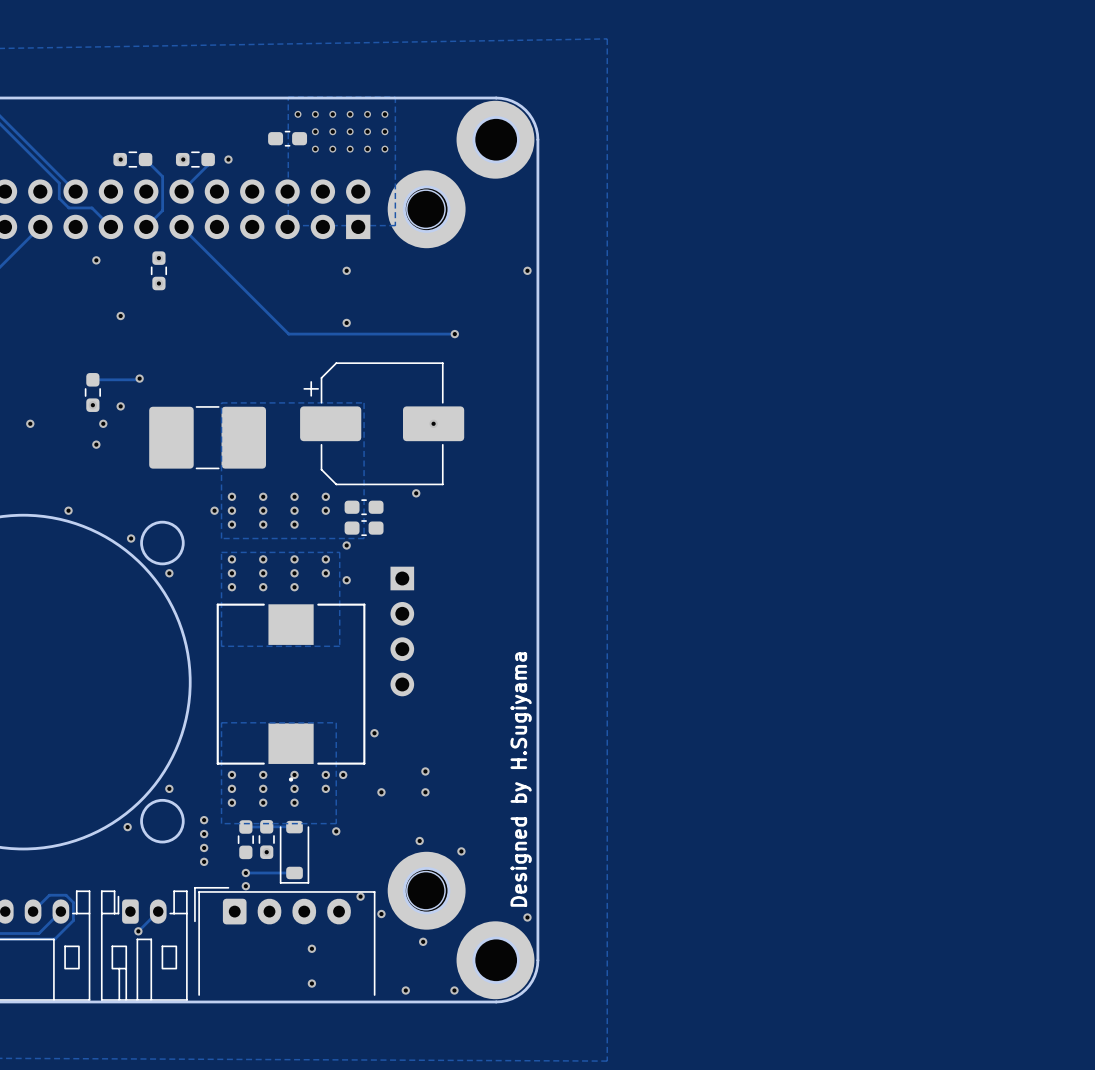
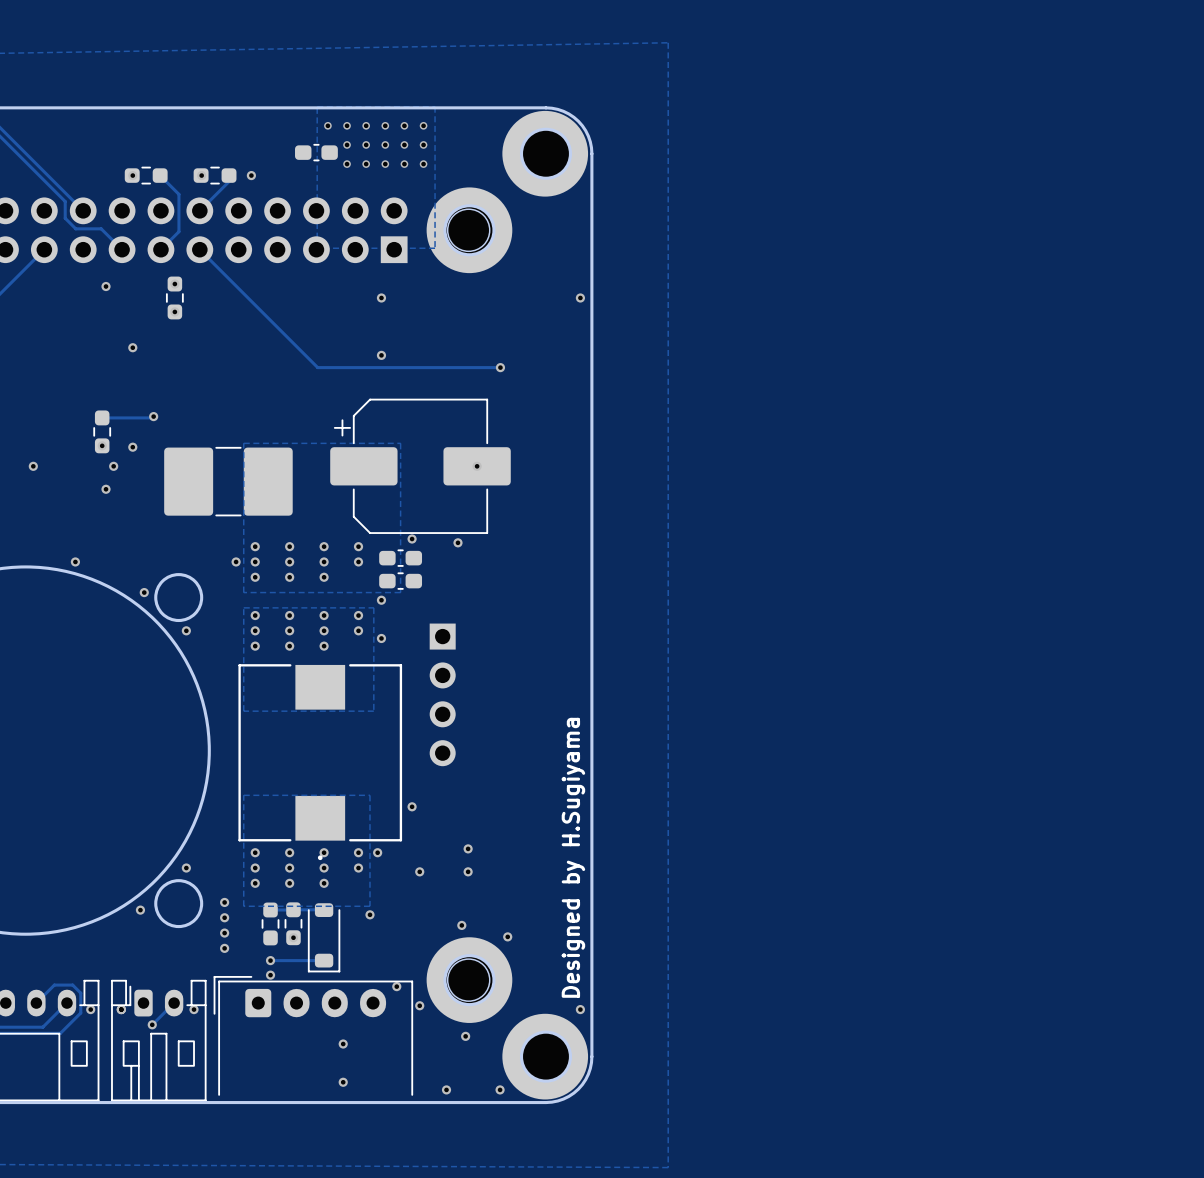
via: none -> (412, 539)
via: none -> (90, 1009)
via: none -> (121, 1009)
via: none -> (194, 1009)

